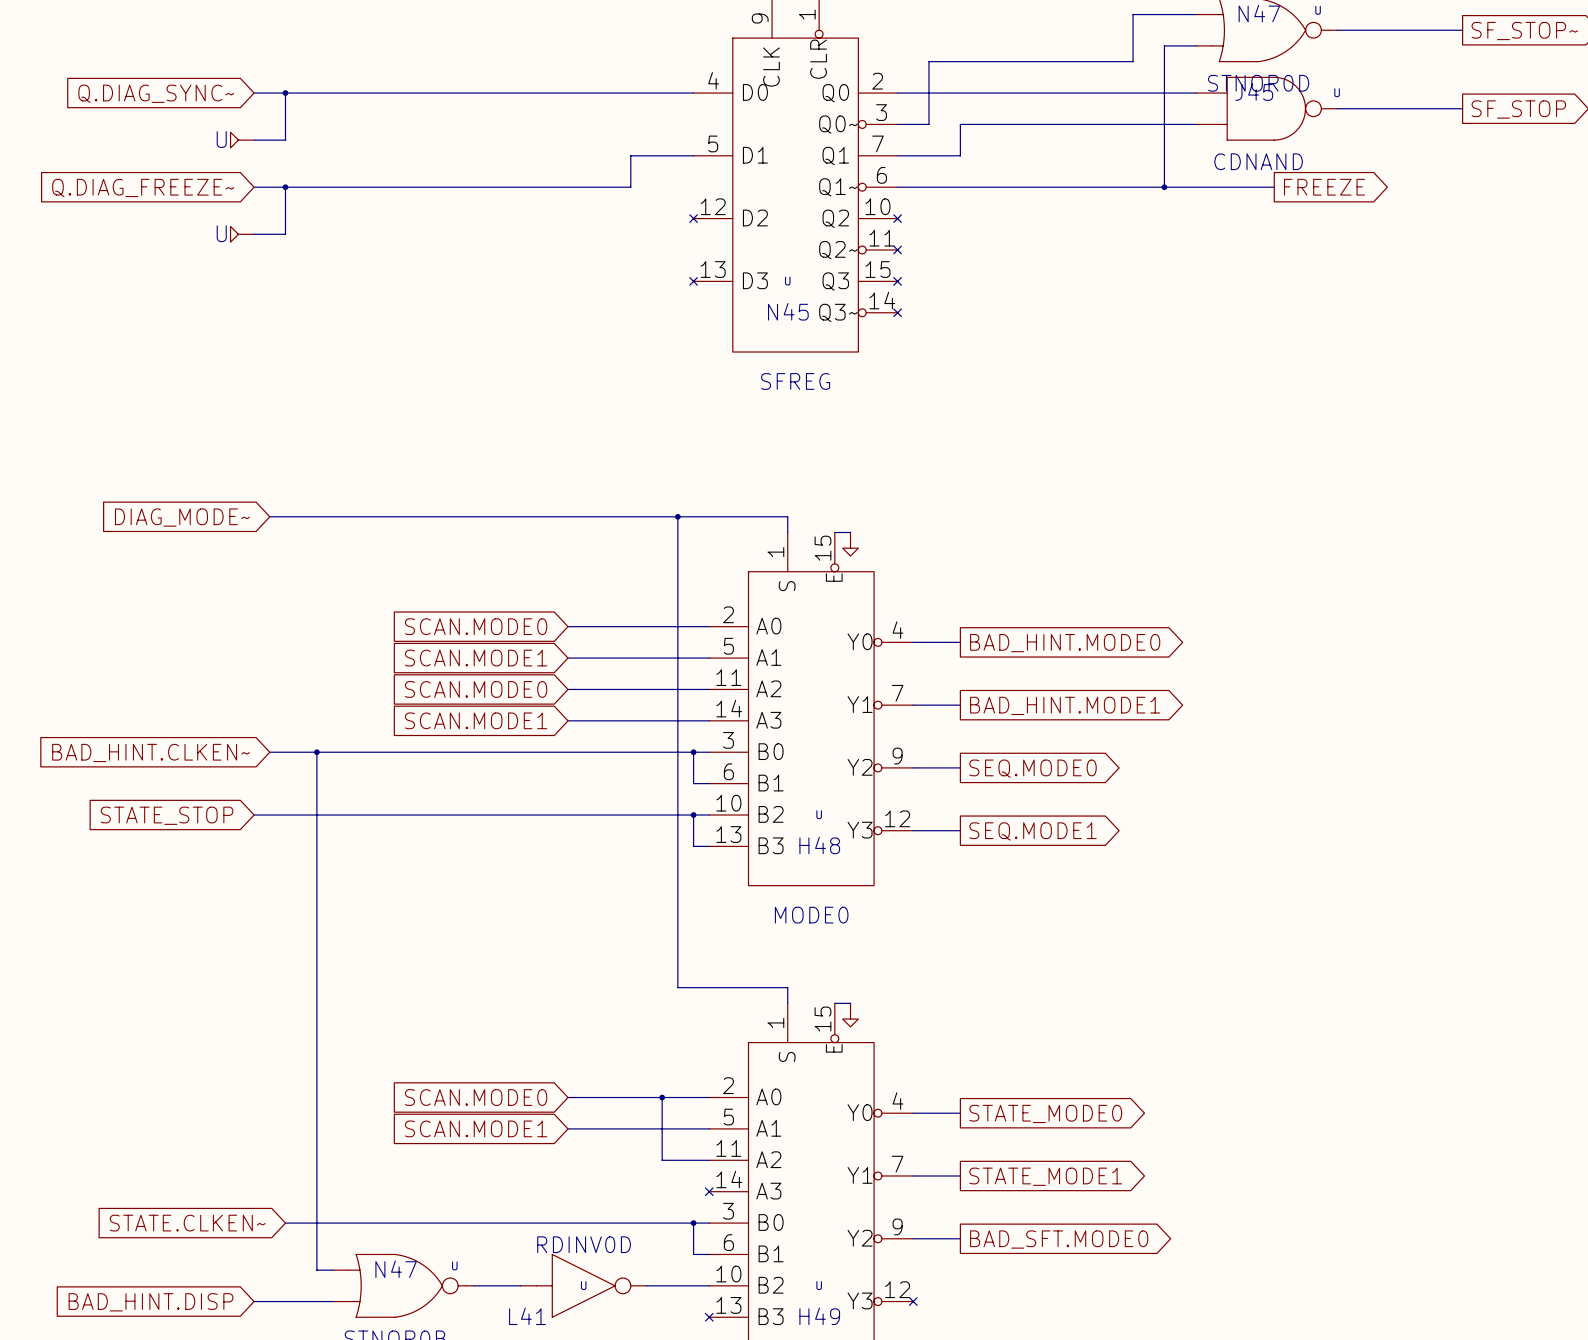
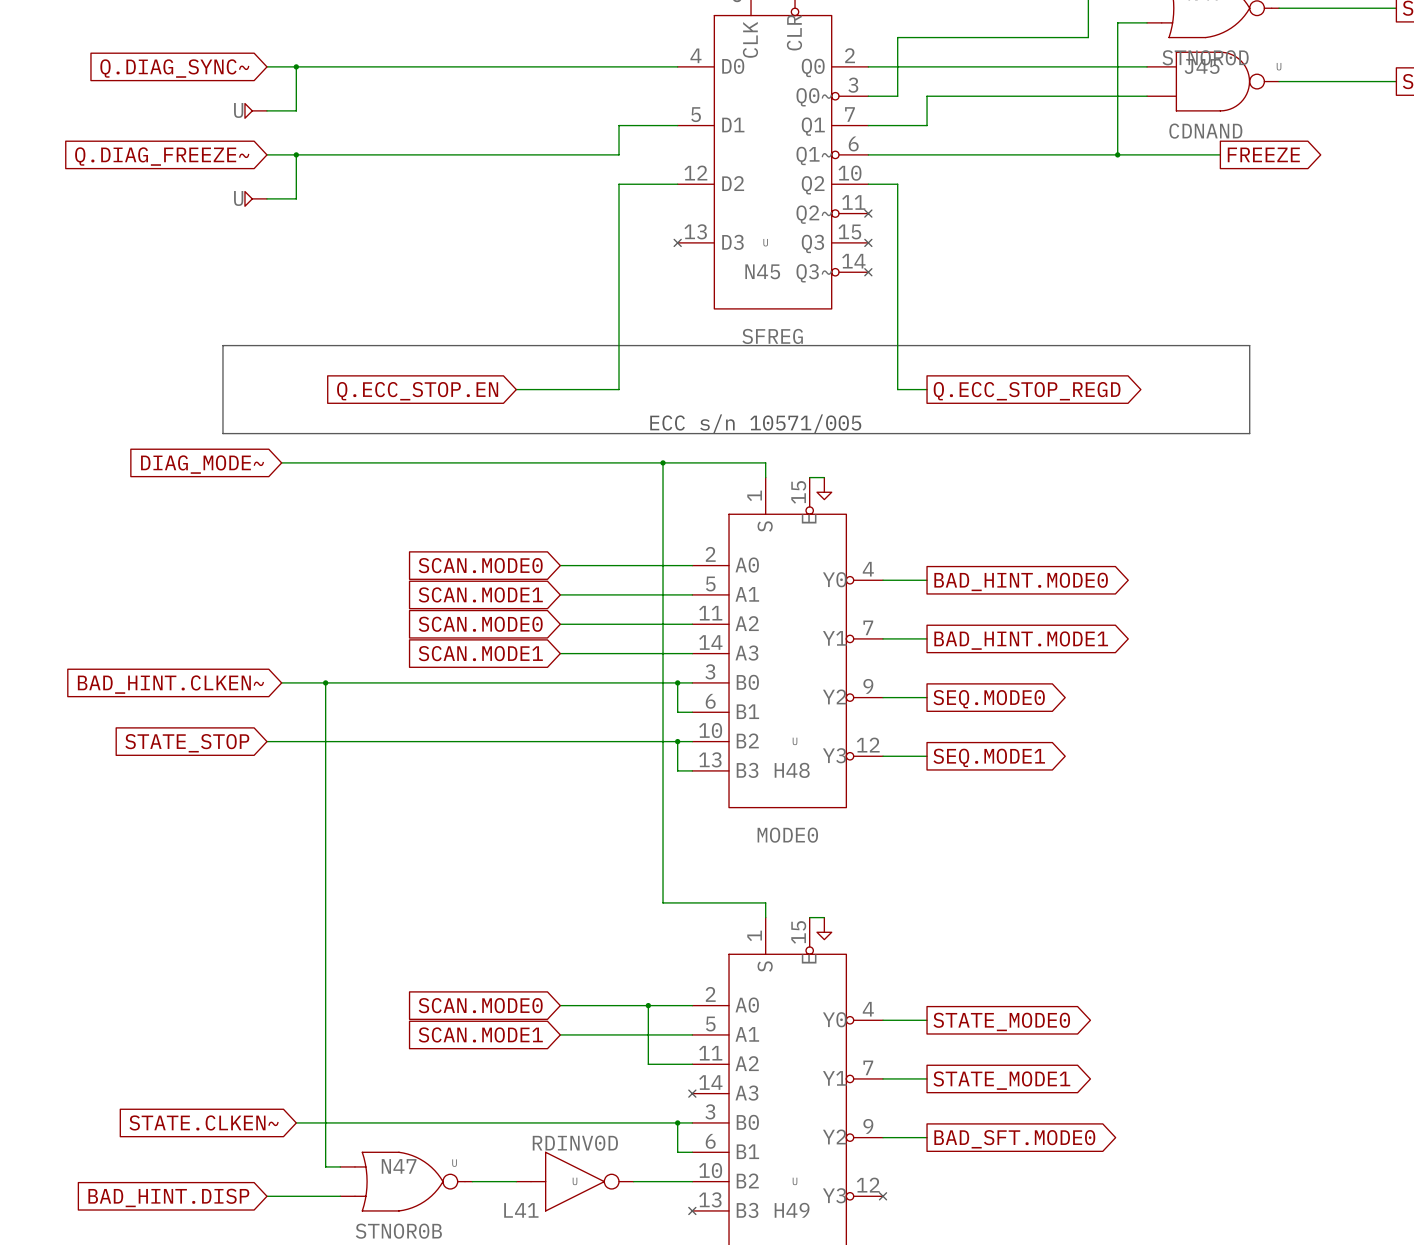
wire: none -> (677, 184) (619, 184) (619, 389) (516, 389)
no-connect mark: (693, 218) -> none
wire: none -> (868, 184) (897, 184) (897, 389) (927, 389)
no-connect mark: (897, 218) -> none
line: none -> (222, 345) (222, 433) (1249, 433) (1249, 345) (222, 345)
global label: none -> Q.ECC_STOP.EN (417, 391)
global label: none -> Q.ECC_STOP_REGD (1027, 391)
text: none -> ECC s/n 10571/005 (755, 423)

